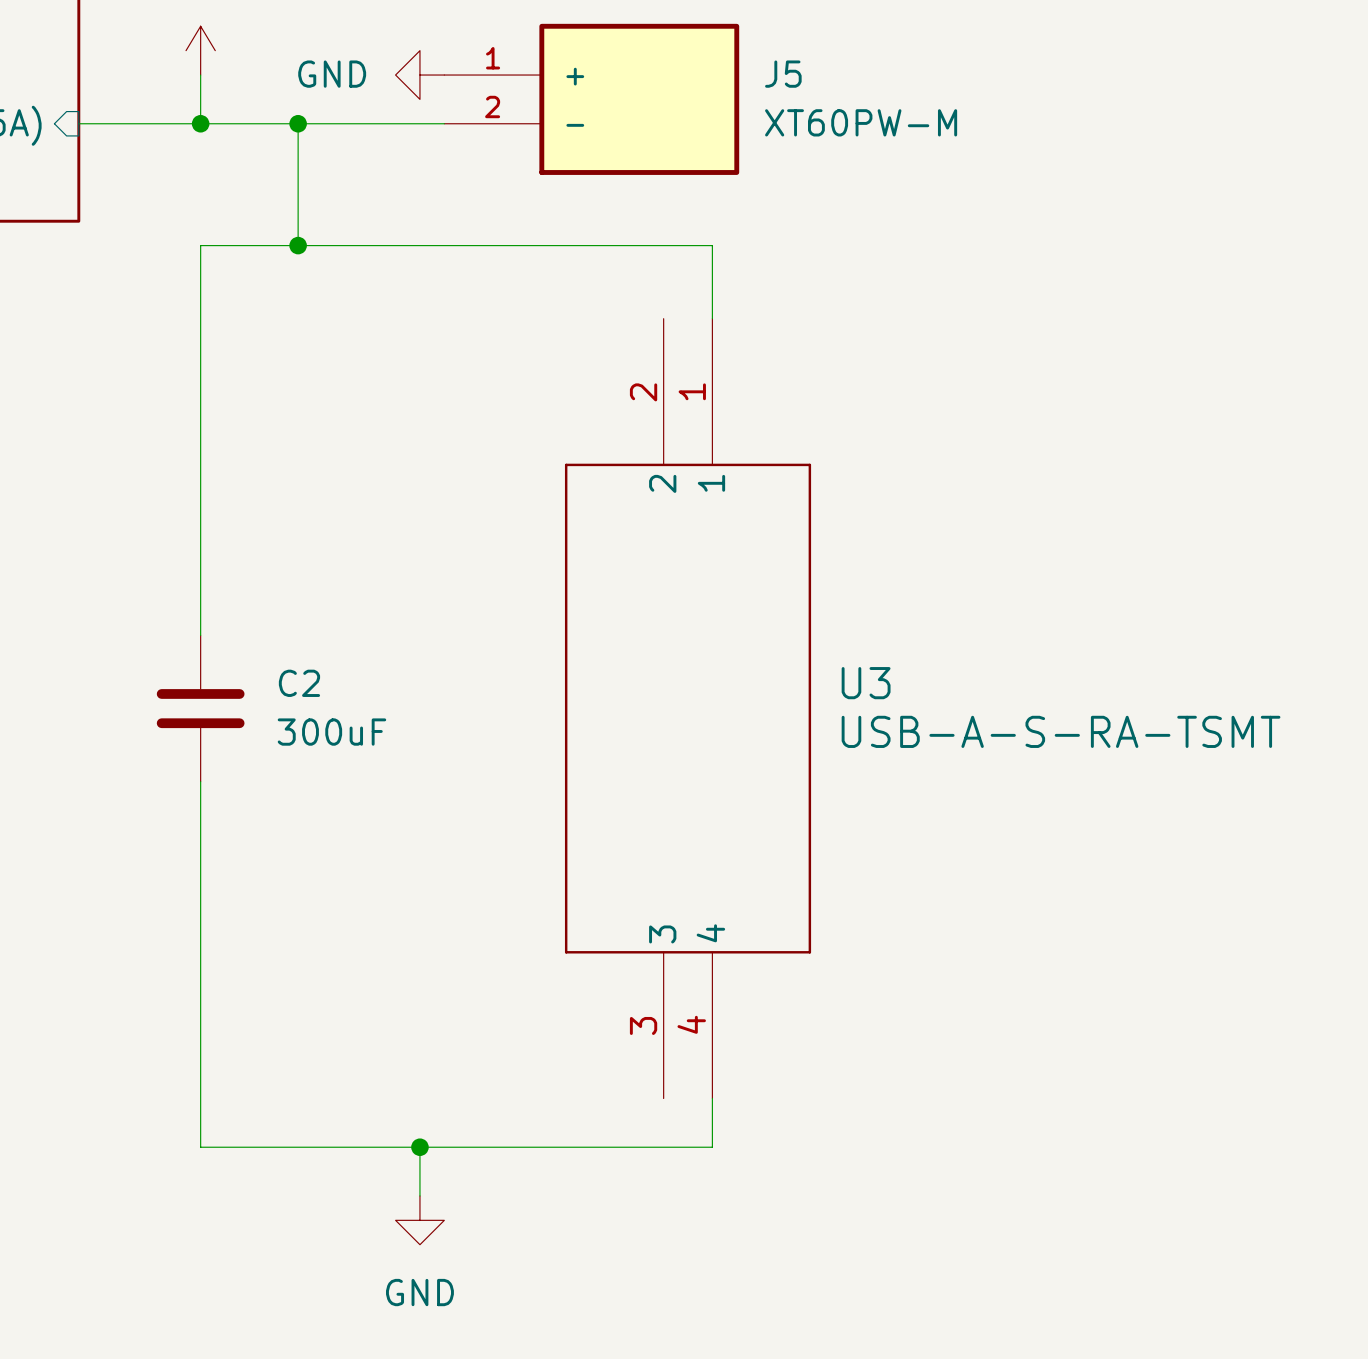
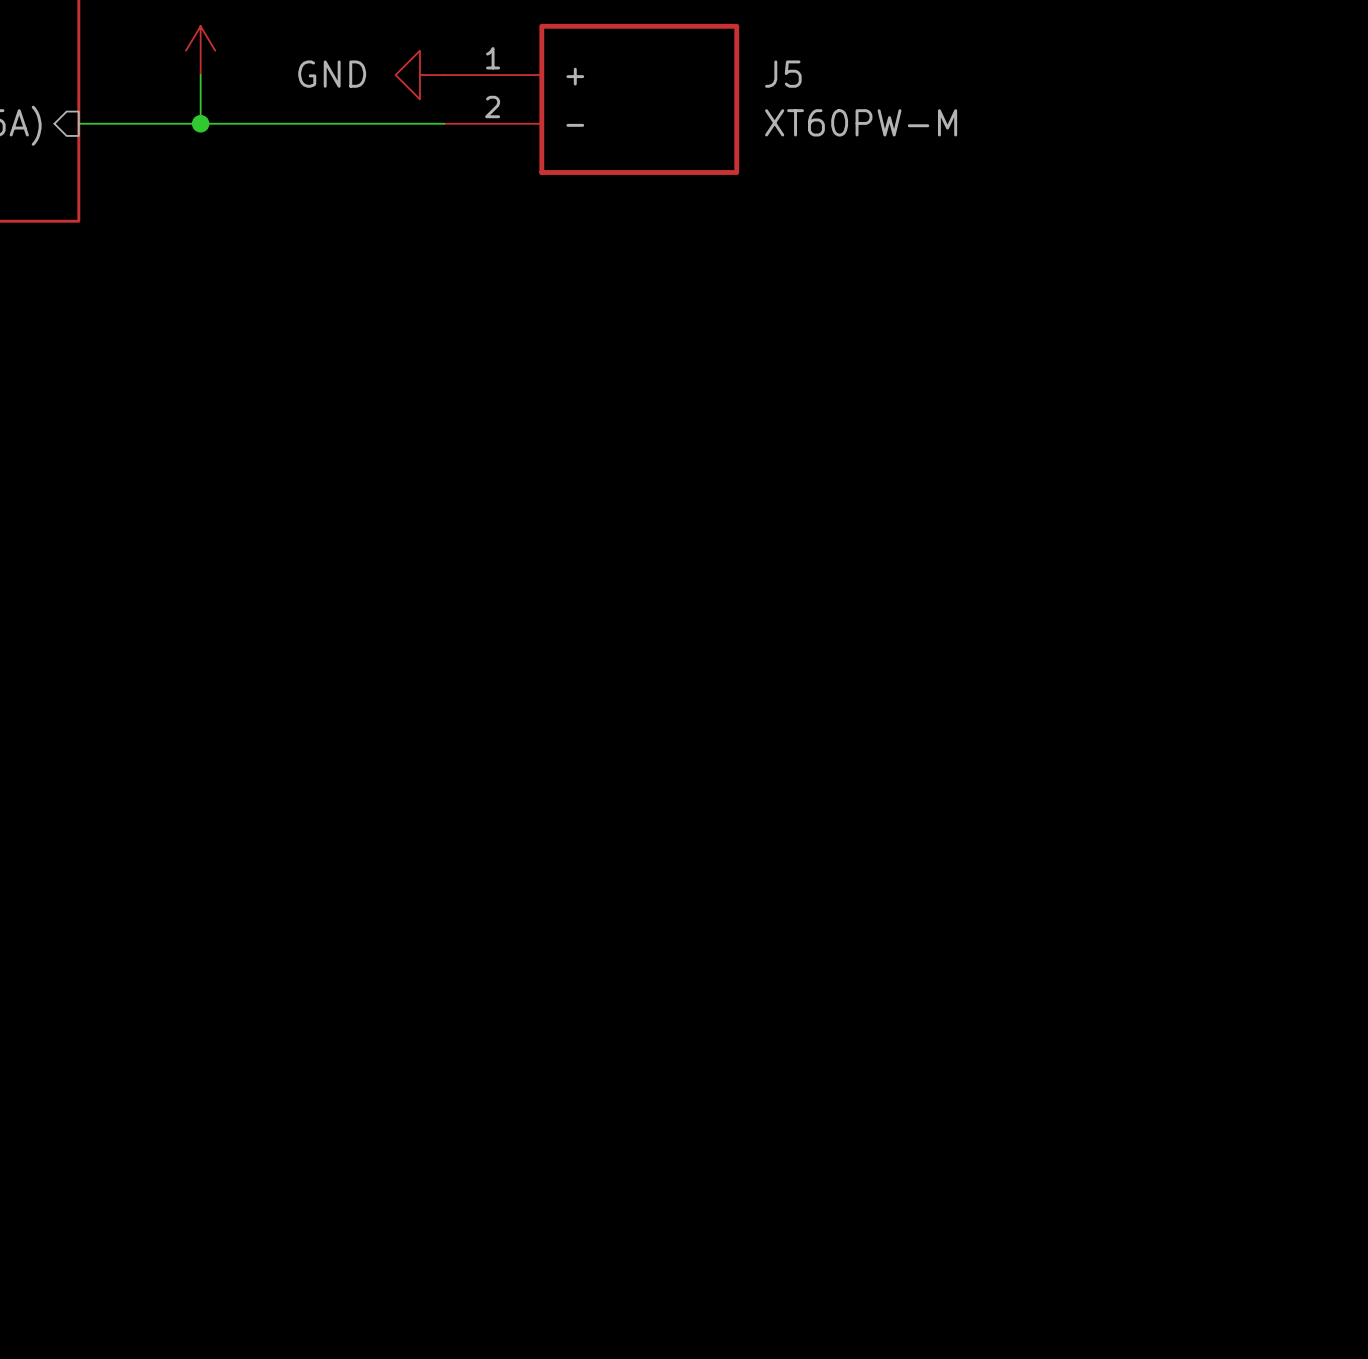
wire: (298, 123) (298, 245) -> none
junction: (298, 123) -> none
junction: (298, 245) -> none
wire: (712, 318) (712, 245) (200, 245) (200, 635) -> none
C2: 300uF (200, 708) -> none
U3: USB-A-S-RA-TSMT (688, 708) -> none
wire: (200, 781) (200, 1147) (712, 1147) (712, 1098) -> none
wire: (419, 1147) (419, 1195) -> none
junction: (419, 1147) -> none
power symbol: GND (419, 1220) -> none

